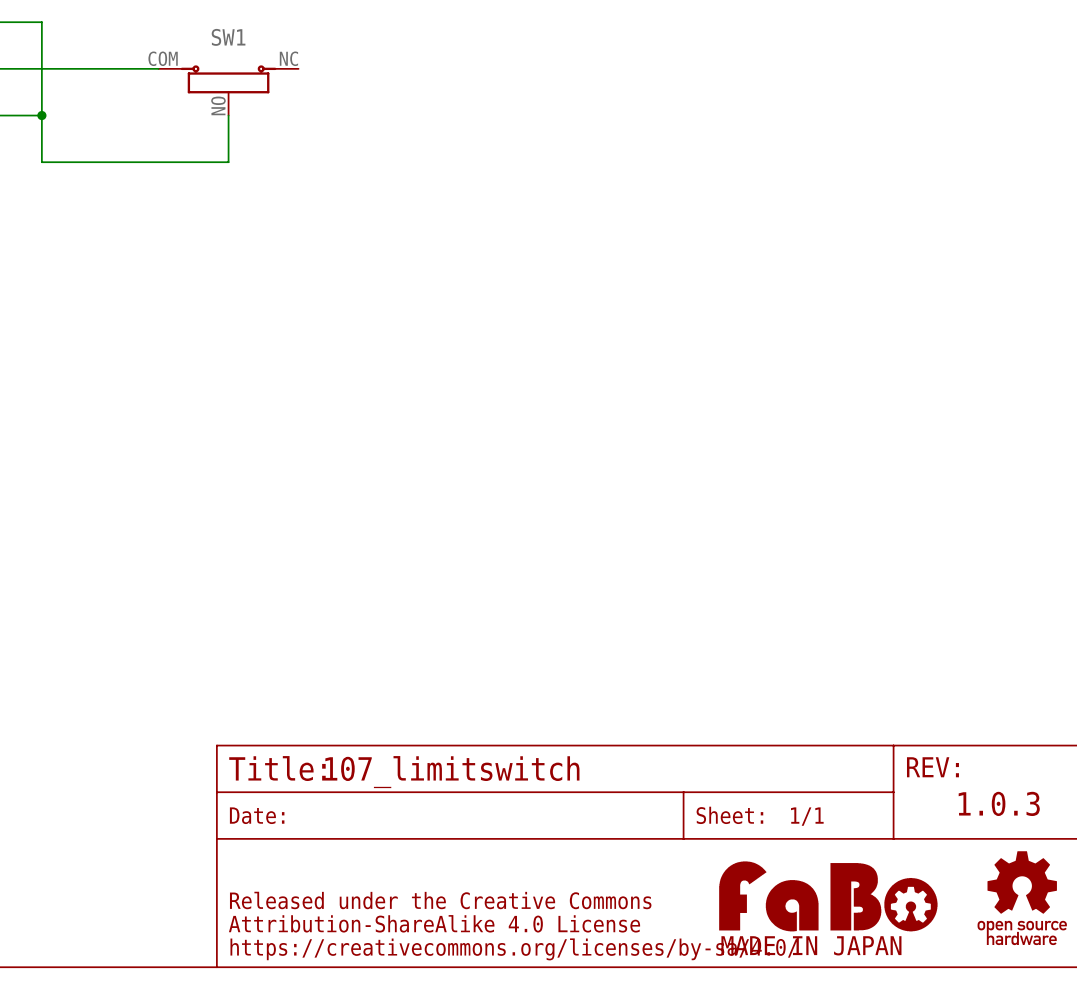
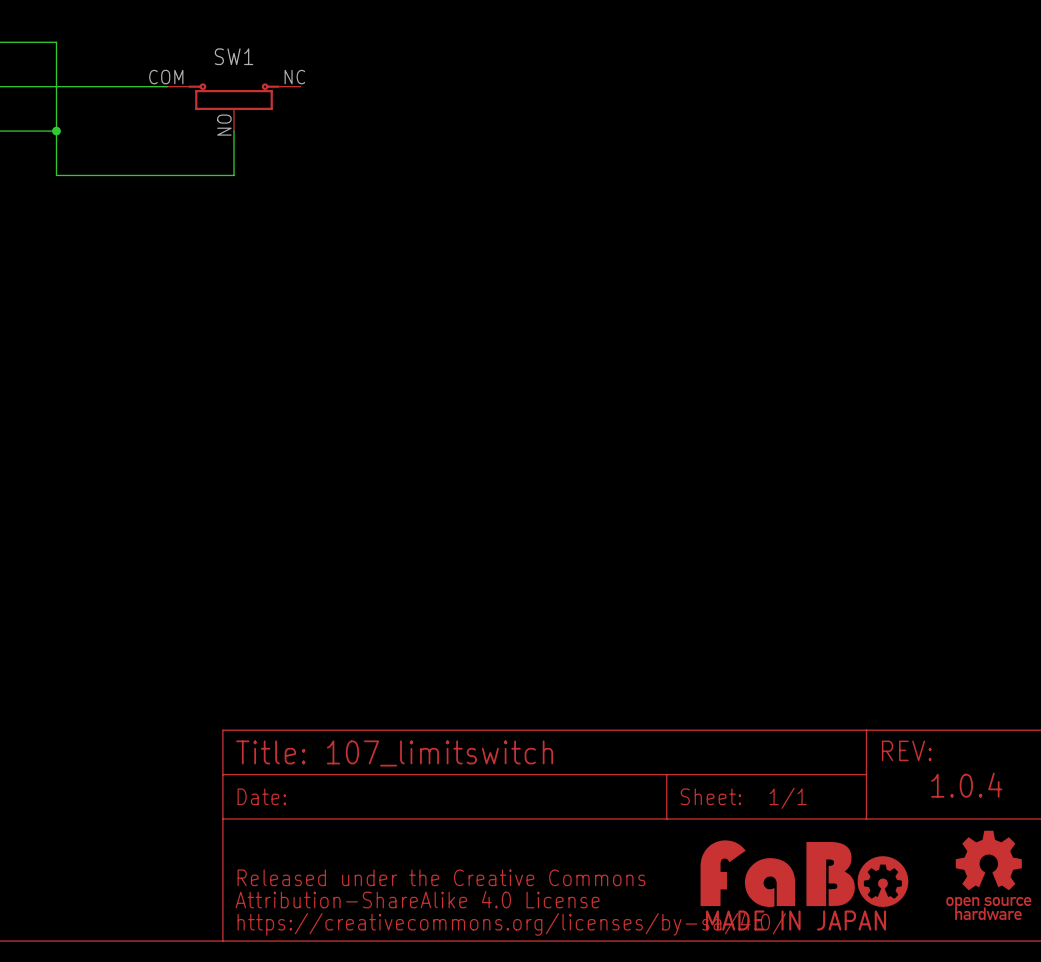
text: 1.0.3 (999, 803) -> 1.0.4 (966, 785)

